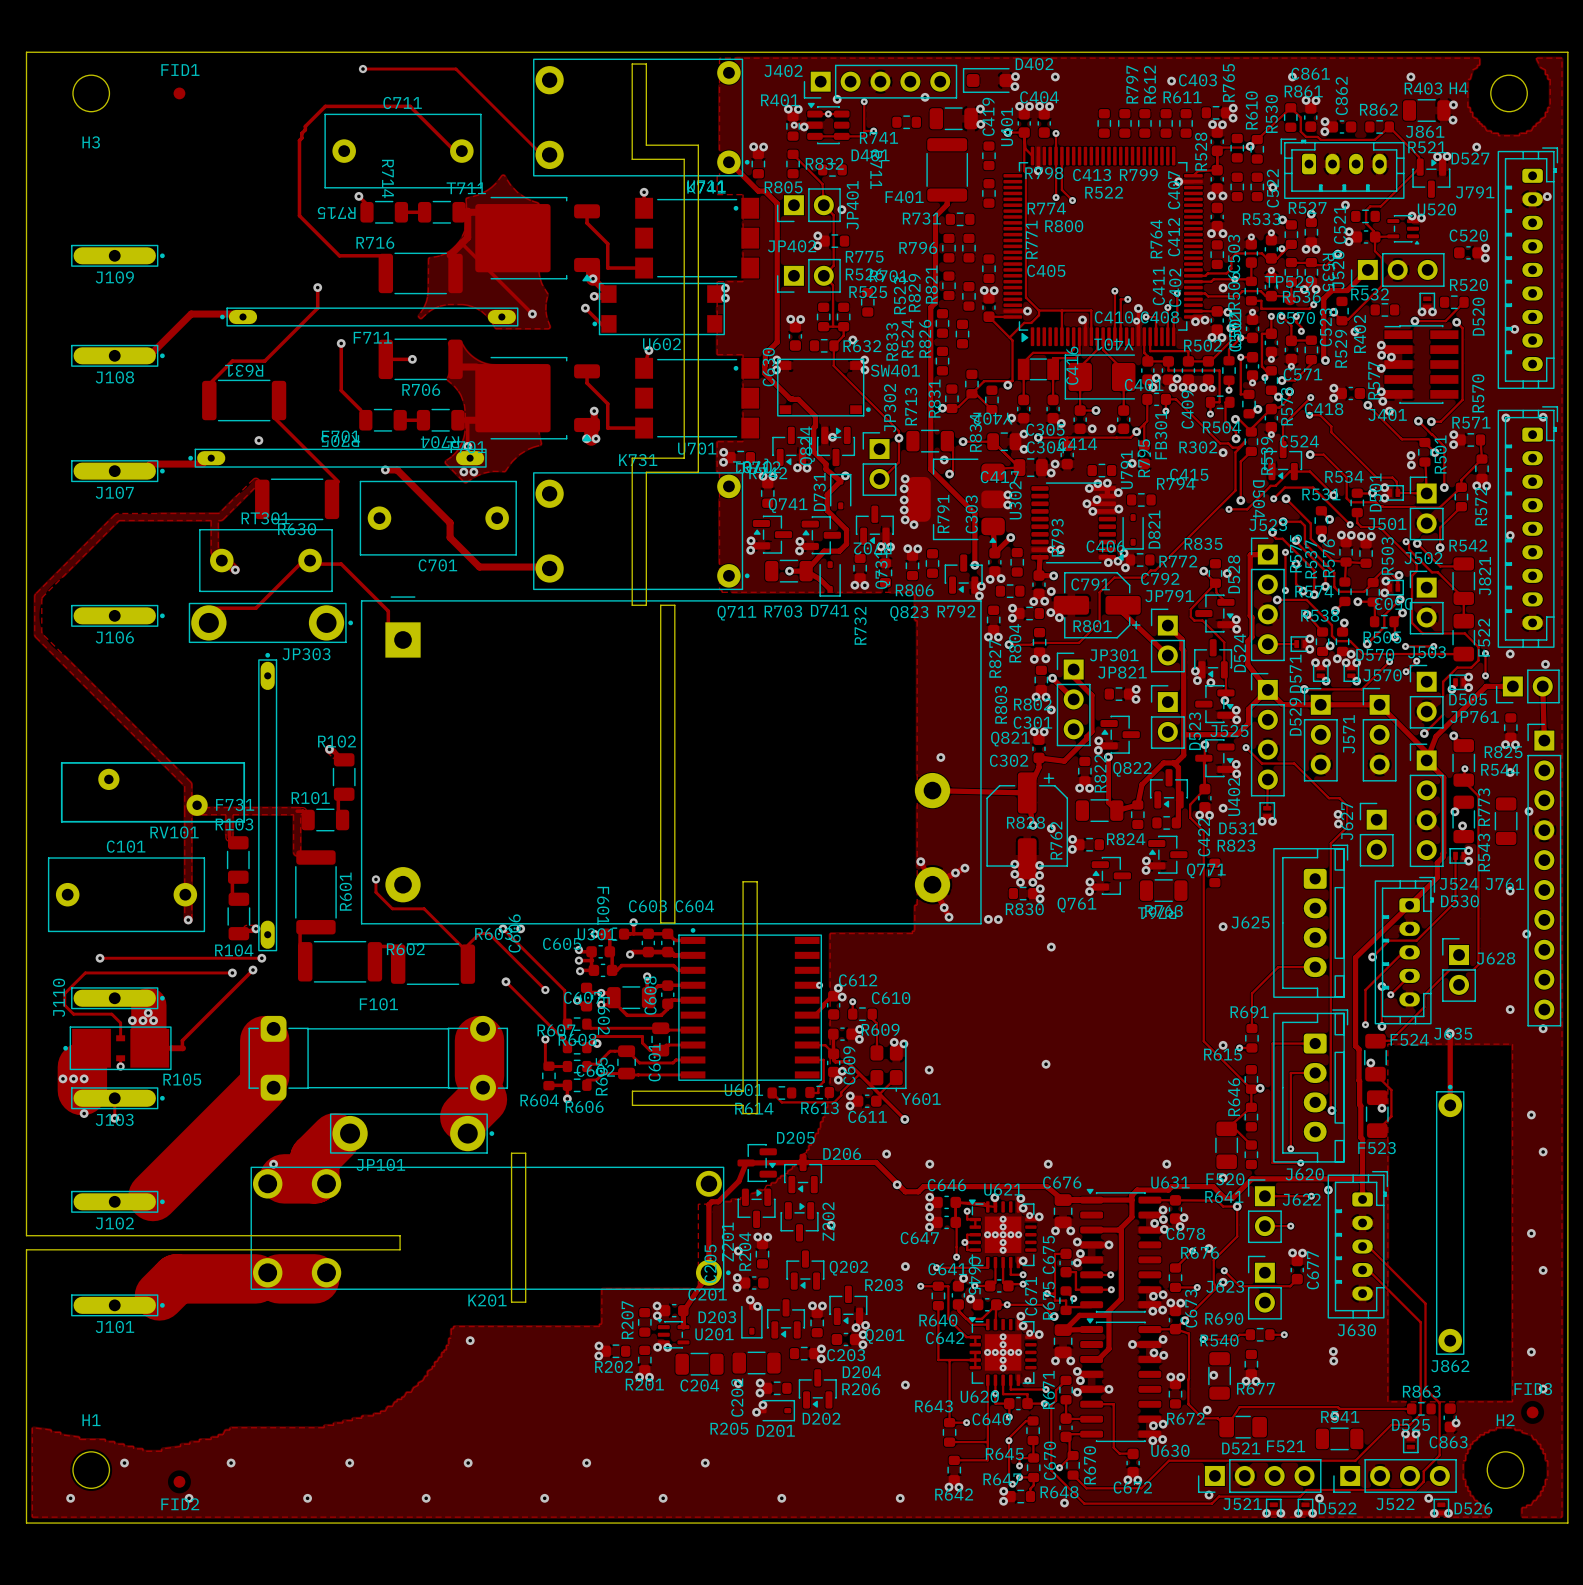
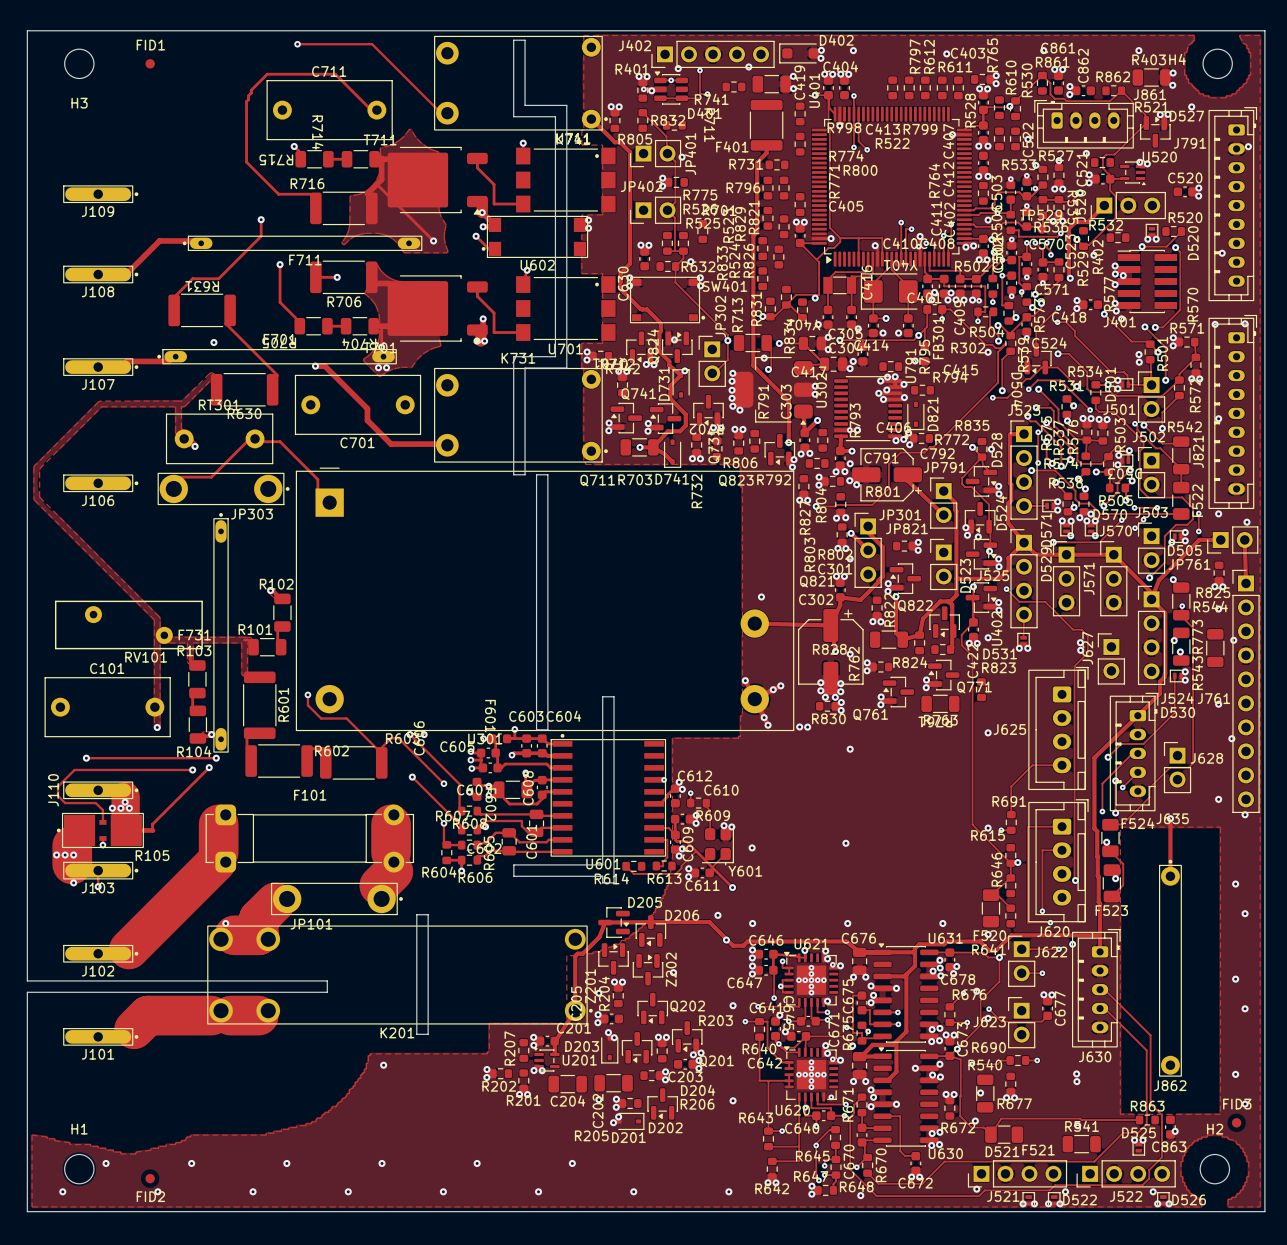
via position: (1007, 1304) -> (778, 1043)

